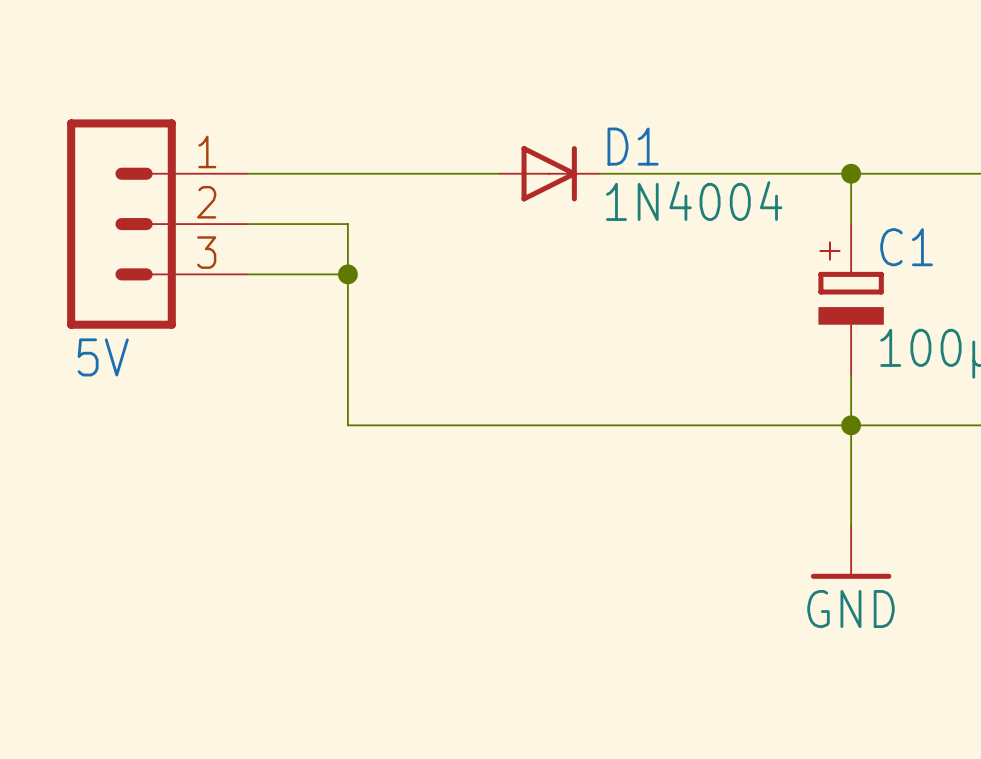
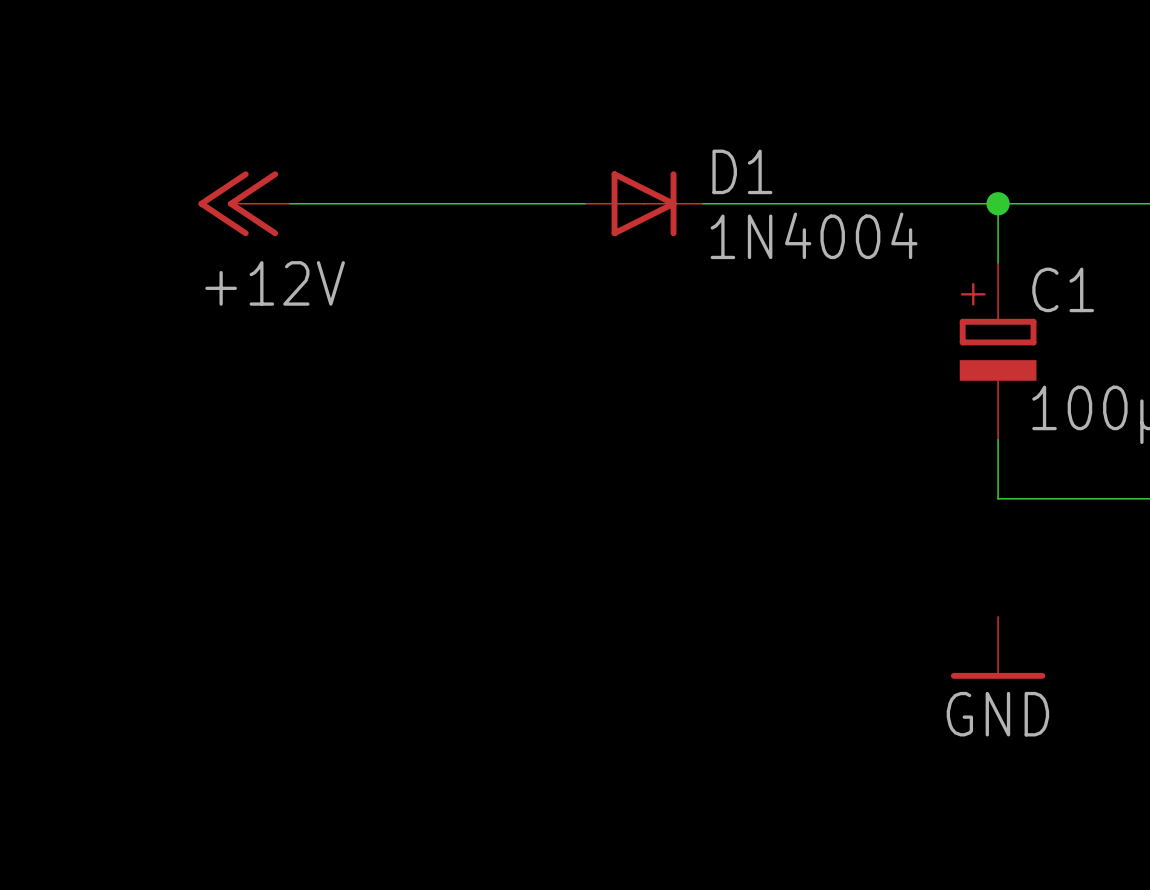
power symbol: none -> +12V (244, 203)
5V: (157, 224) -> none
wire: (247, 224) (347, 224) (347, 425) (851, 425) (851, 525) -> none
wire: (247, 274) (347, 274) -> none
junction: (347, 274) -> none
junction: (851, 425) -> none

